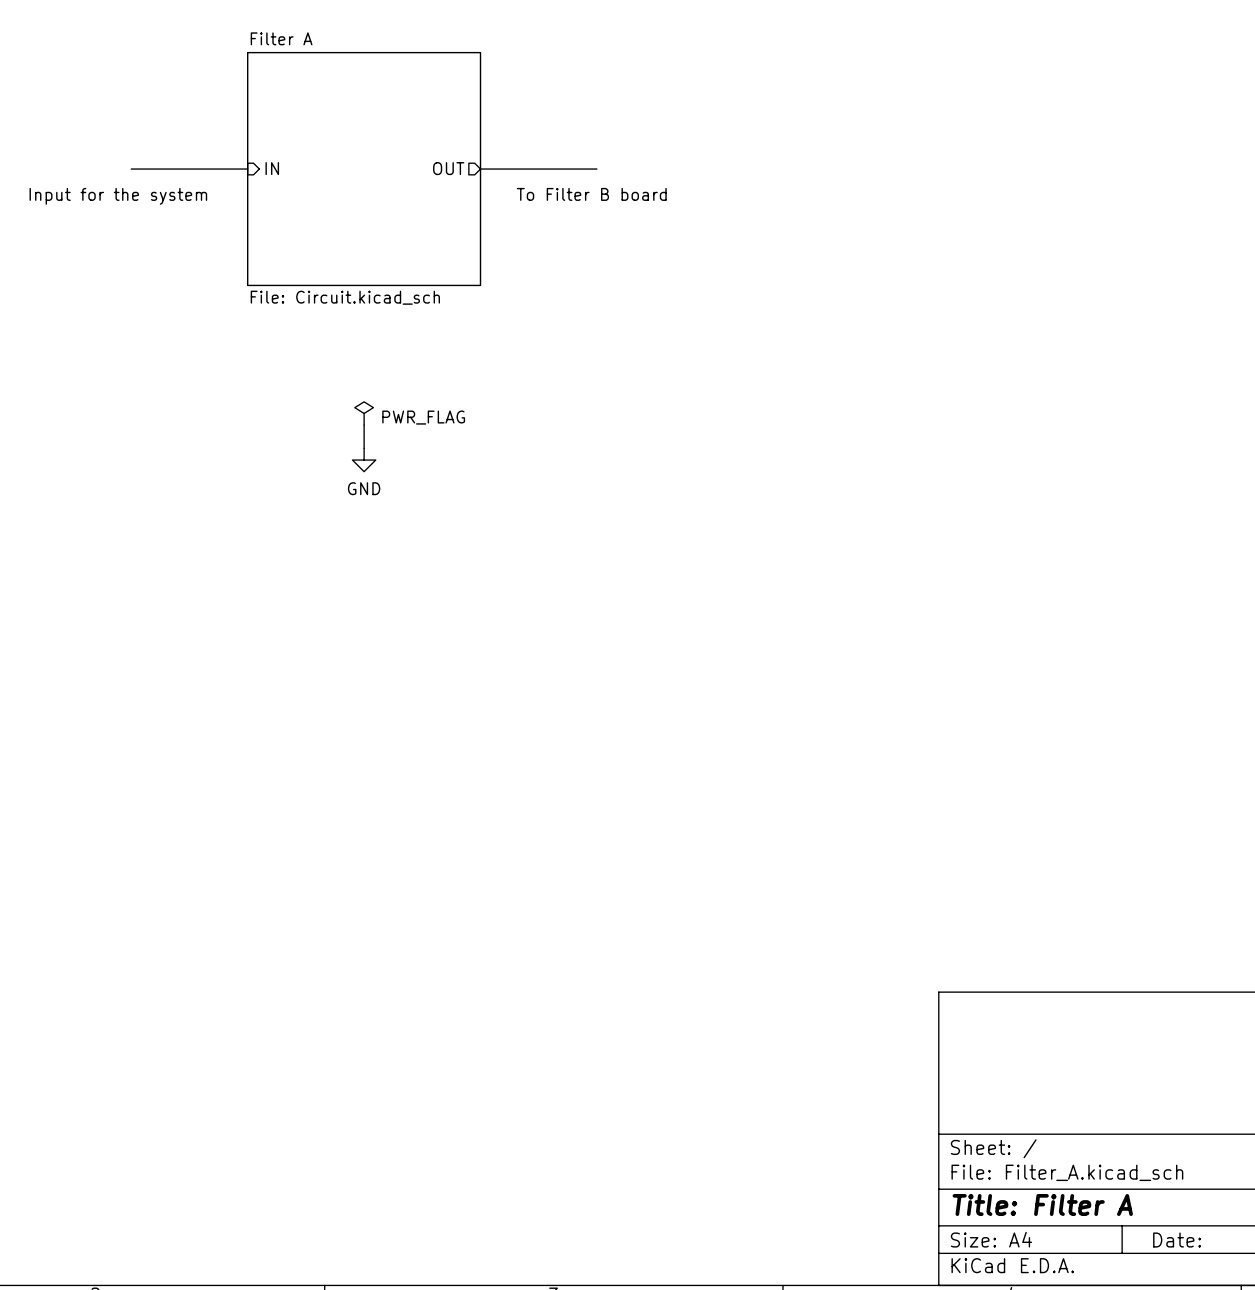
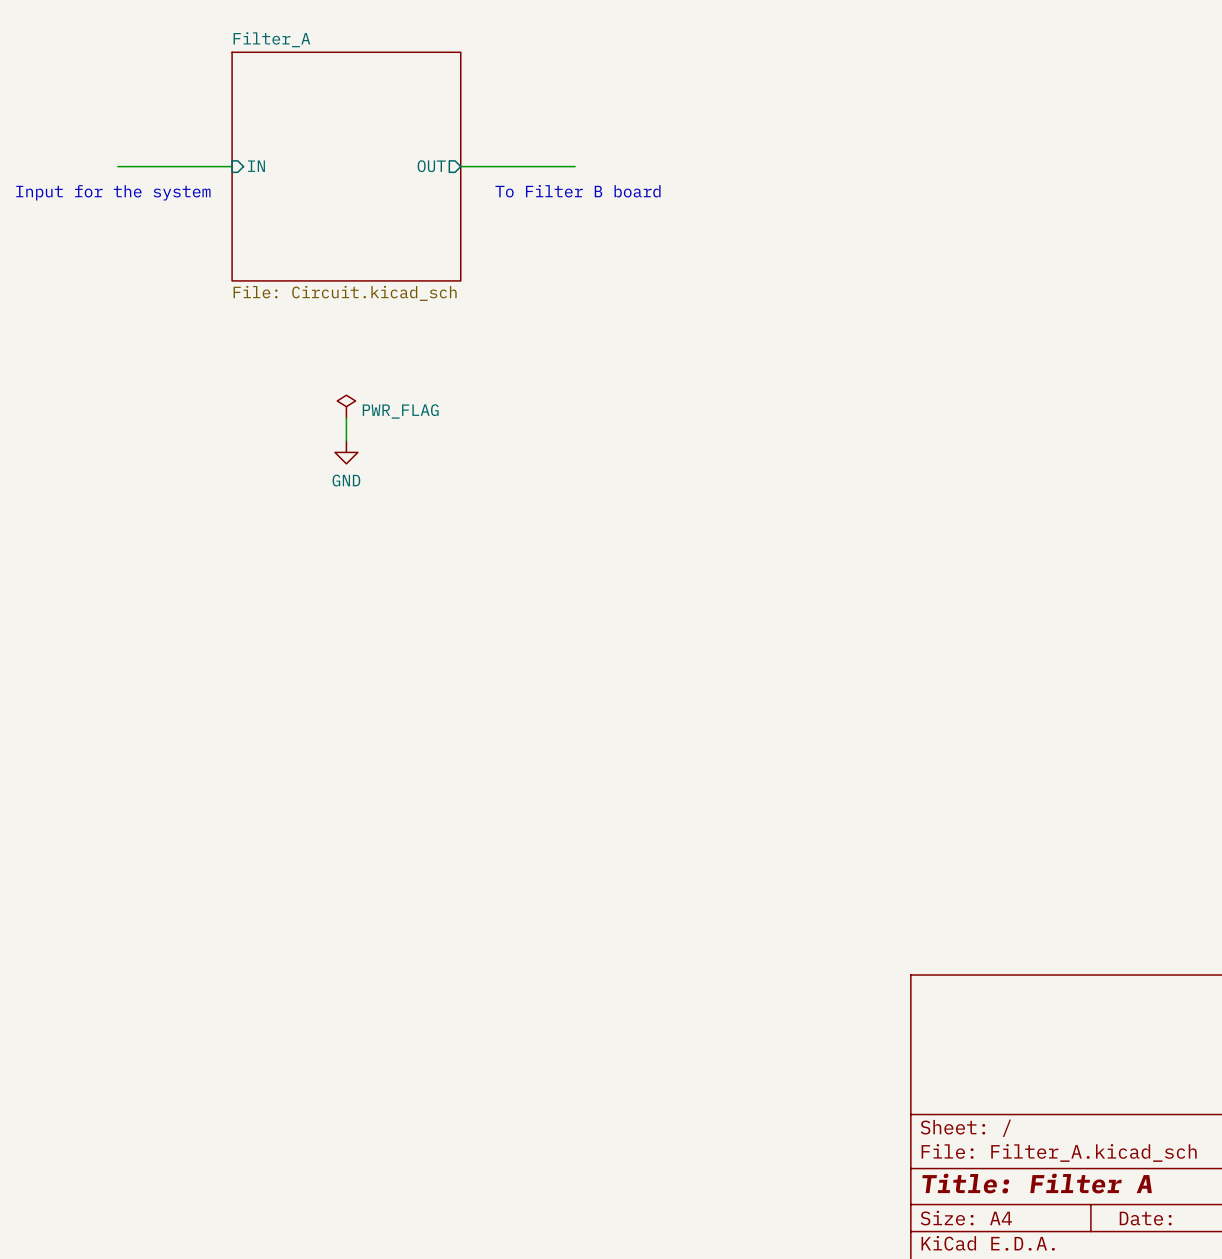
sheet Filter A name: Filter A (281, 38) -> Filter_A (271, 39)

